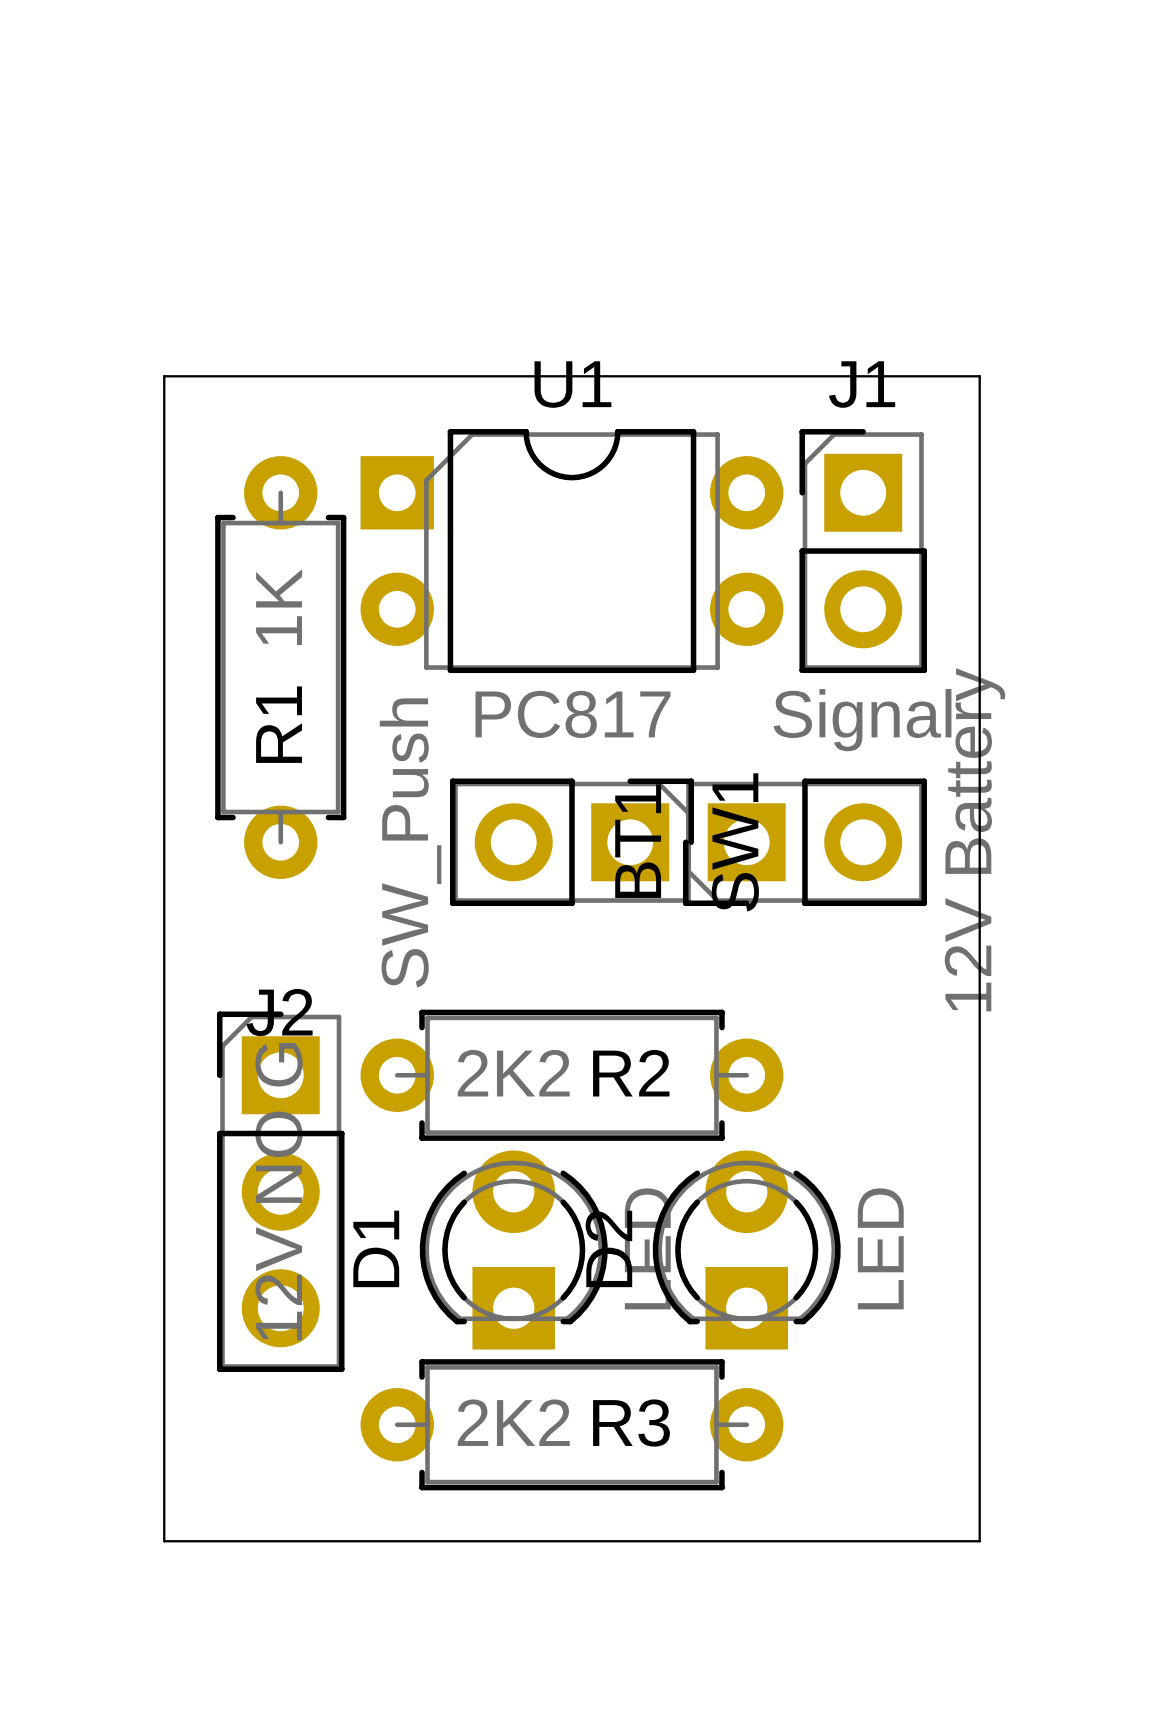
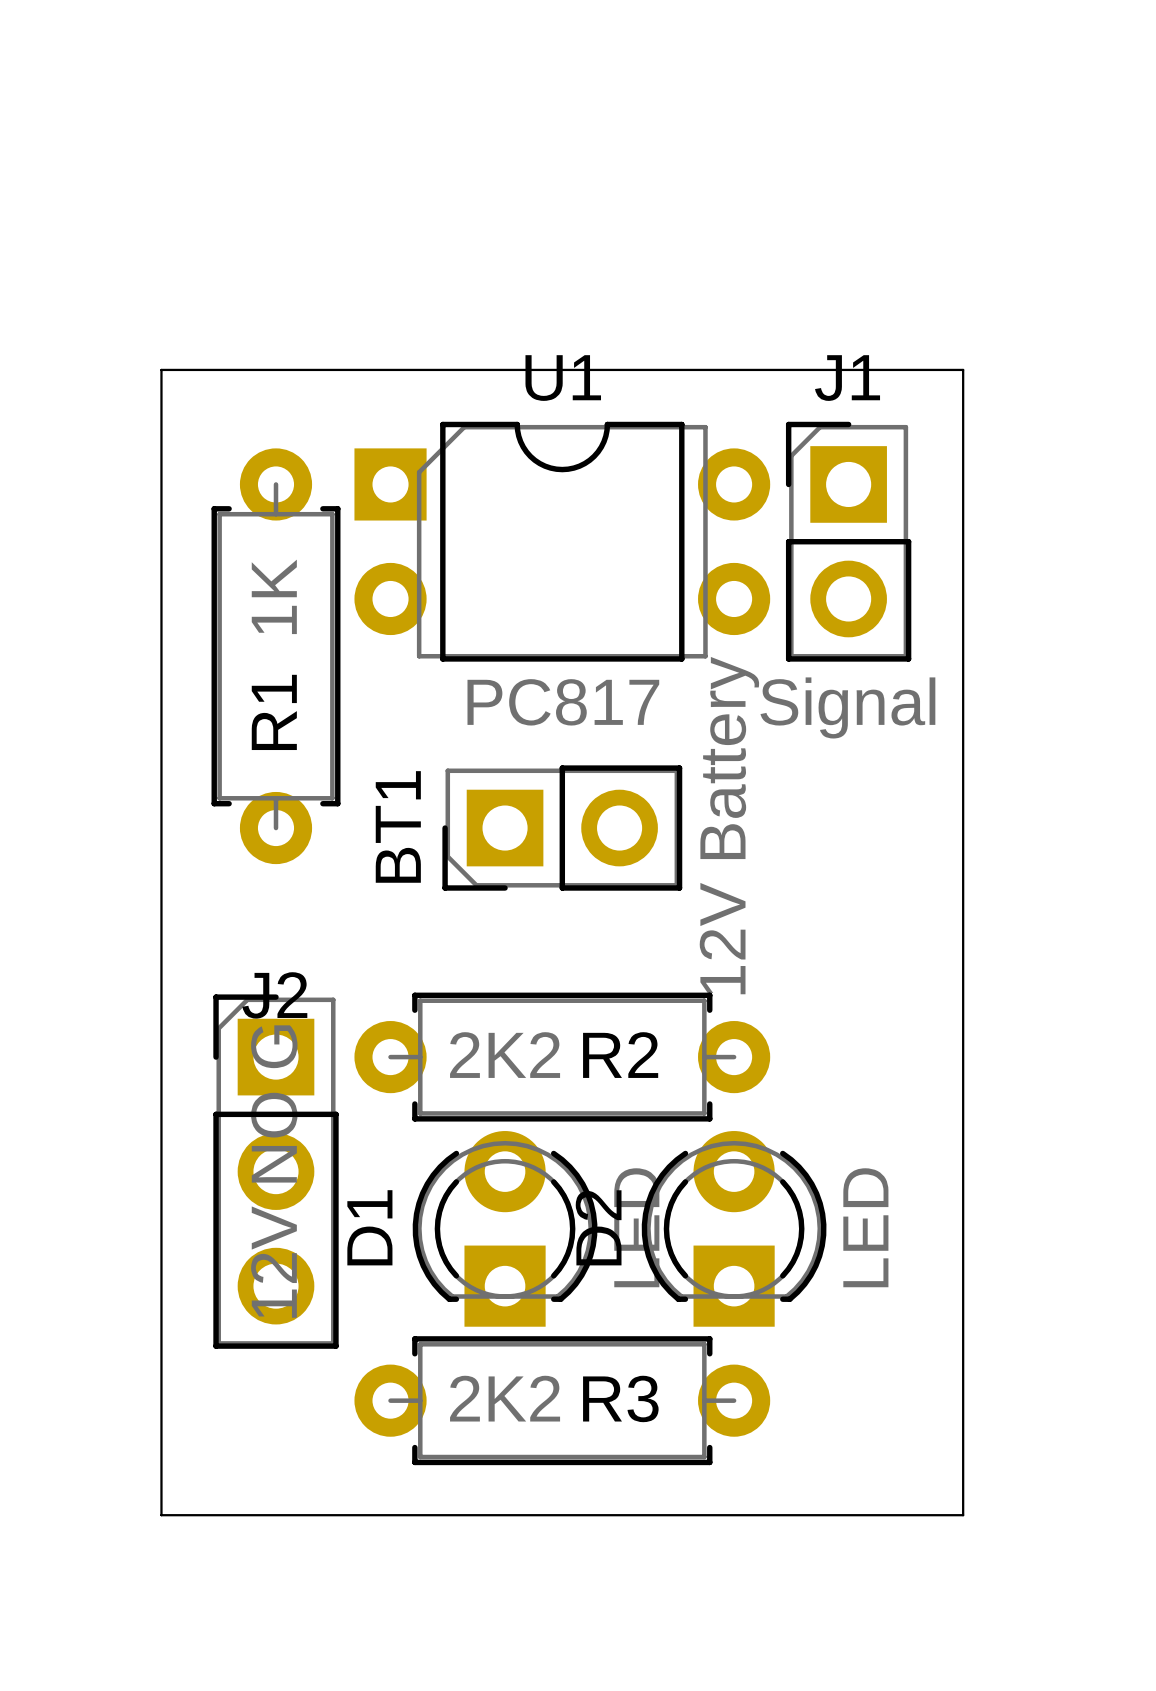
SW1: SW_Push (571, 842) -> none
BT1 position: (804, 842) -> (562, 828)

